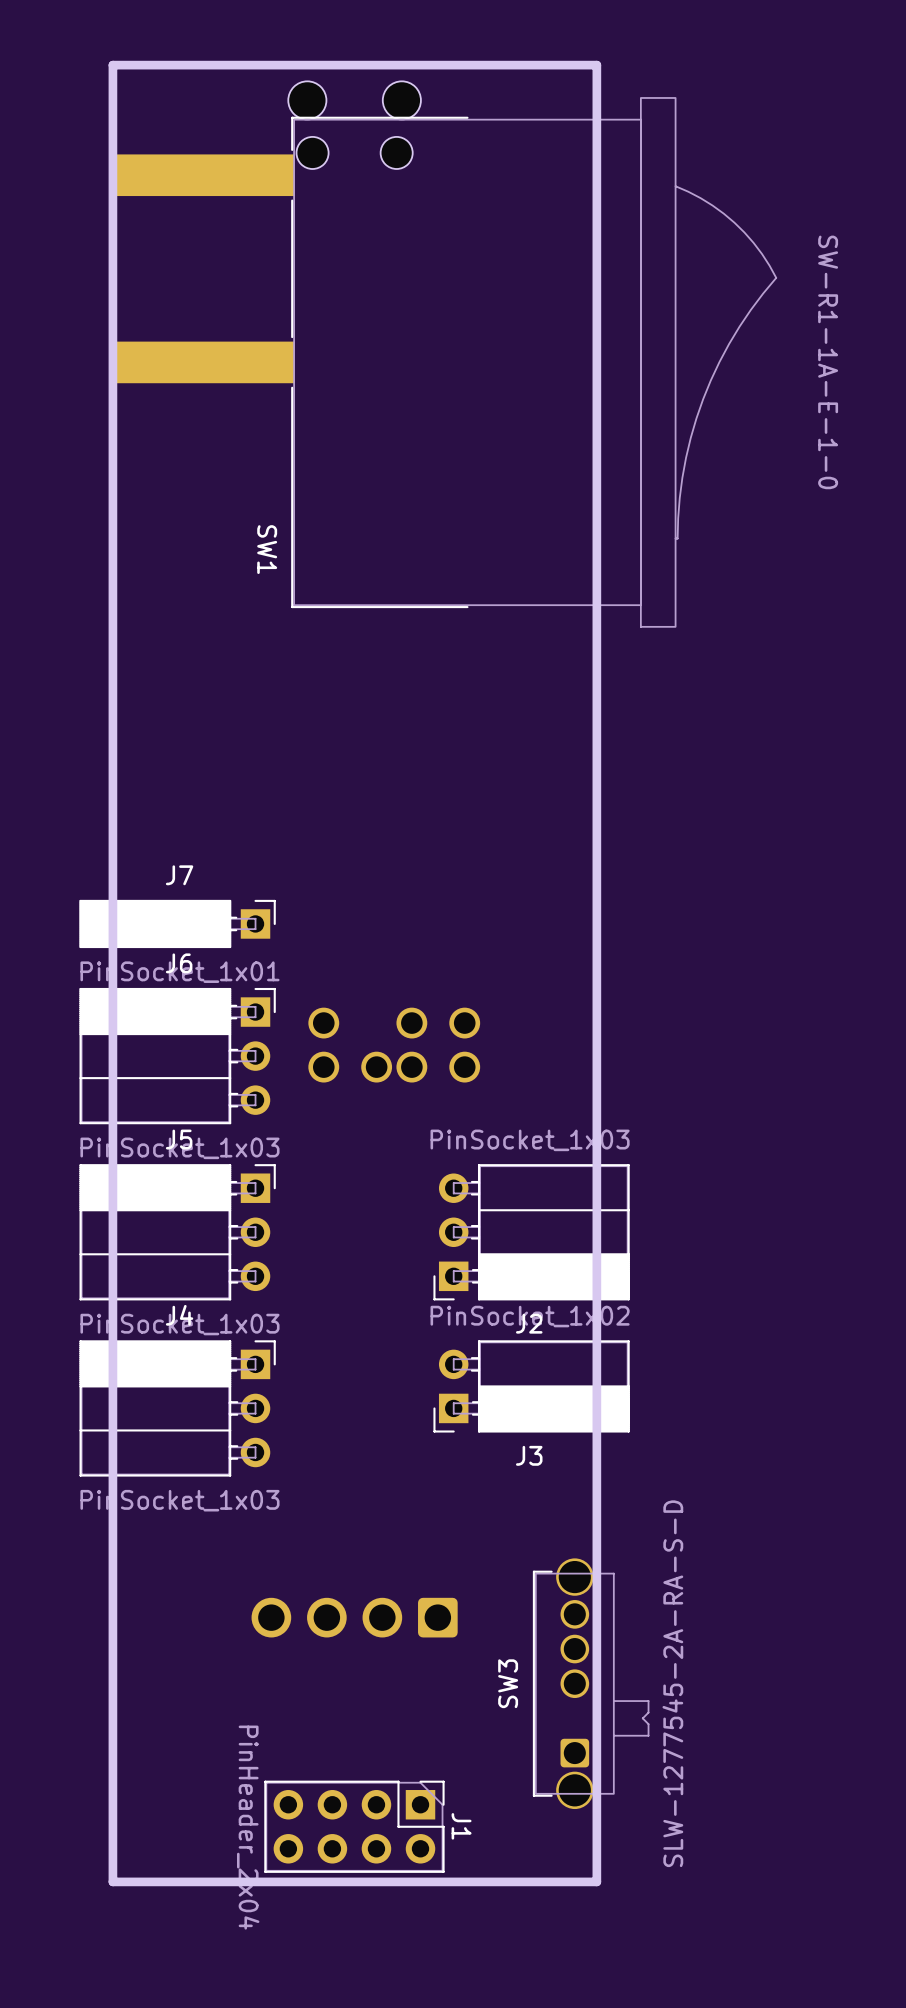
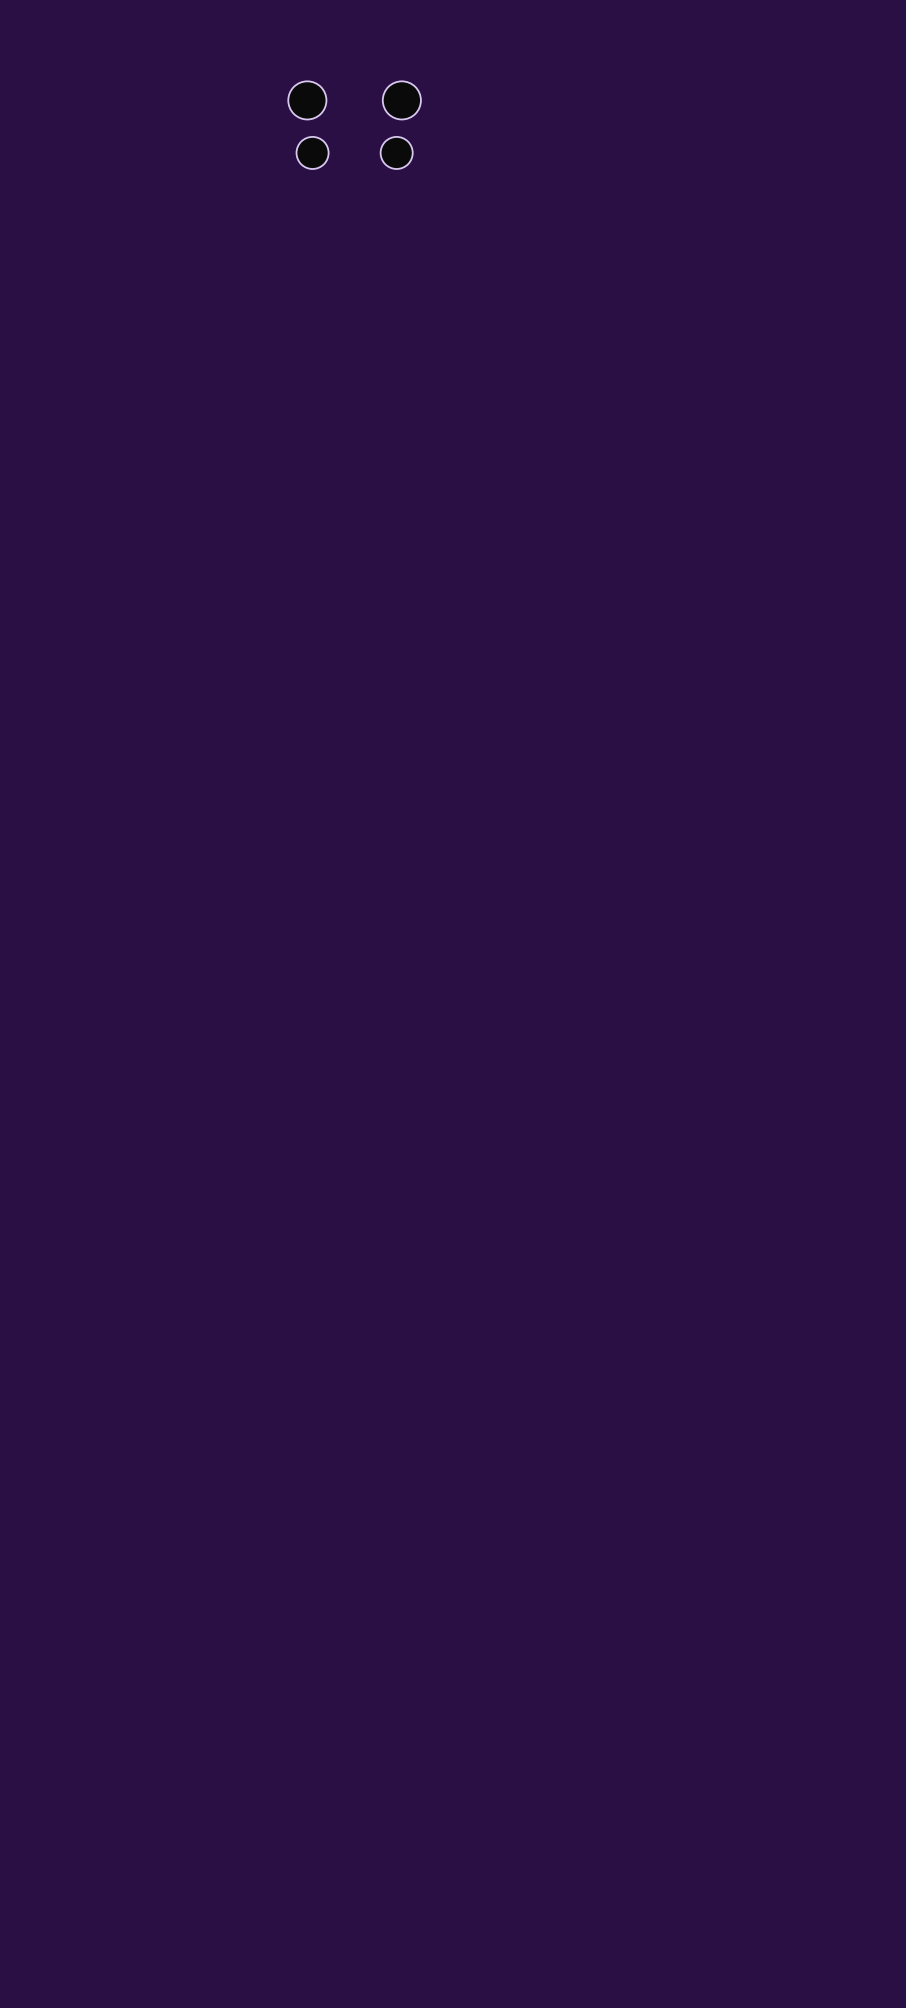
board edge: (596, 65) (112, 65) (112, 1881) (596, 1881) (596, 65) -> none
SW1: SW-R1-1A-E-1-0 (445, 362) -> none
J7: PinSocket_1x01 (177, 923) -> none
part: (394, 1045) -> none
J6: PinSocket_1x03 (177, 1056) -> none
J5: PinSocket_1x03 (177, 1232) -> none
J2: PinSocket_1x03 (531, 1232) -> none
J3: PinSocket_1x02 (531, 1386) -> none
J4: PinSocket_1x03 (177, 1408) -> none
part: (354, 1617) -> none
SW3: SLW-1277545-2A-RA-S-D (591, 1683) -> none
J1: PinHeader_2x04 (354, 1826) -> none

